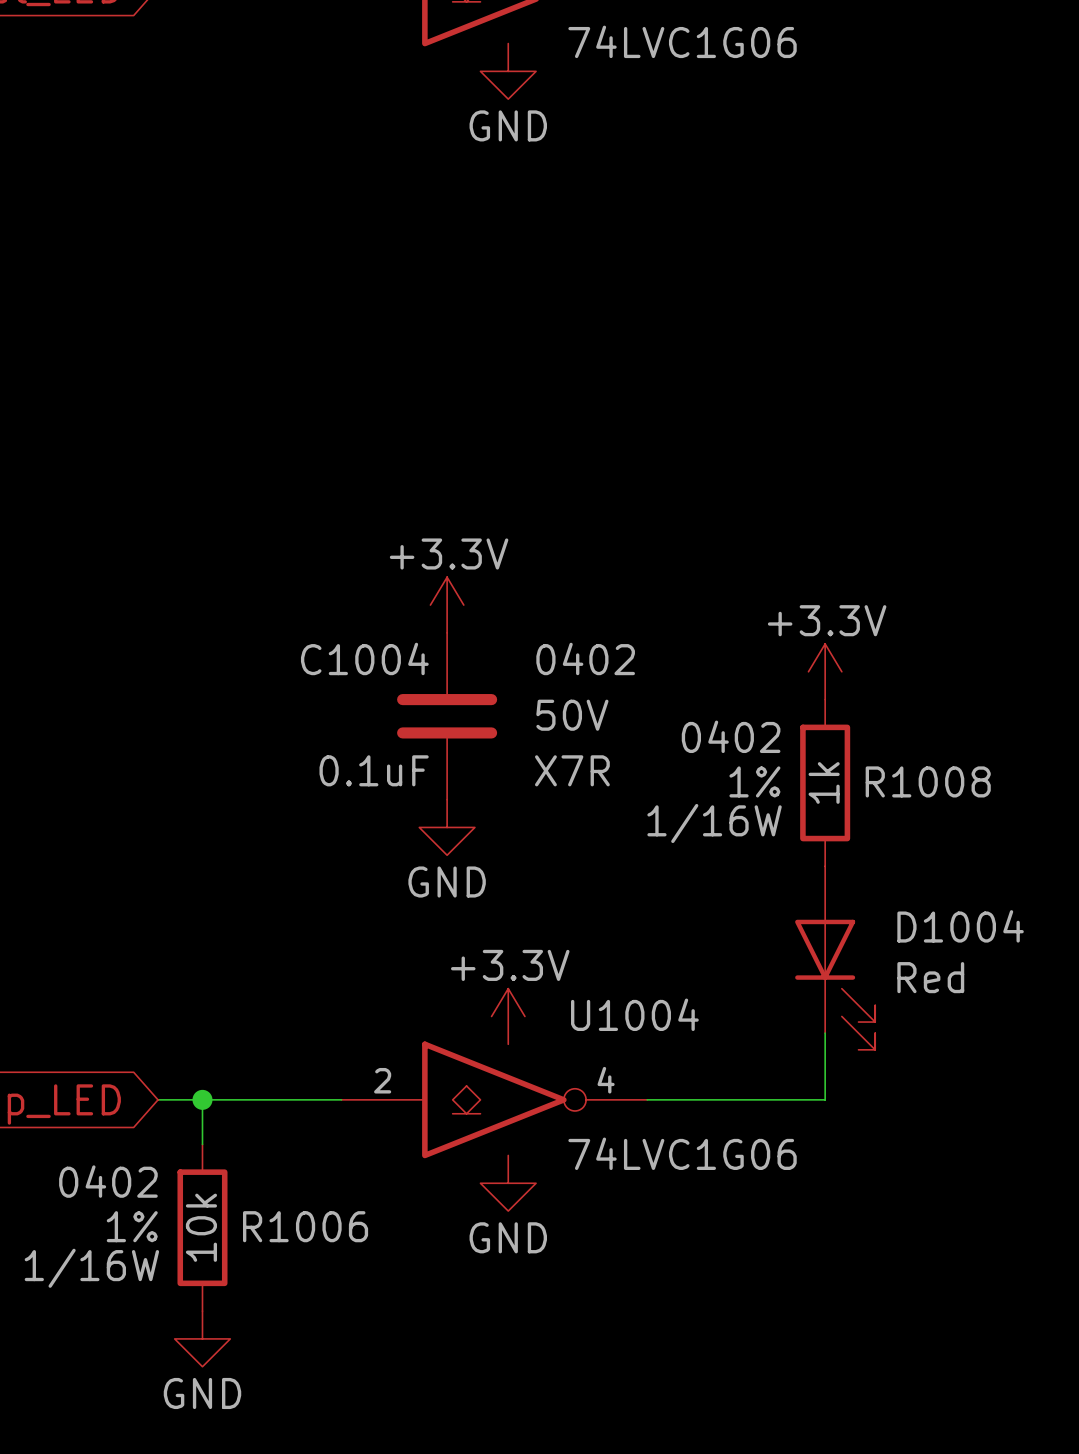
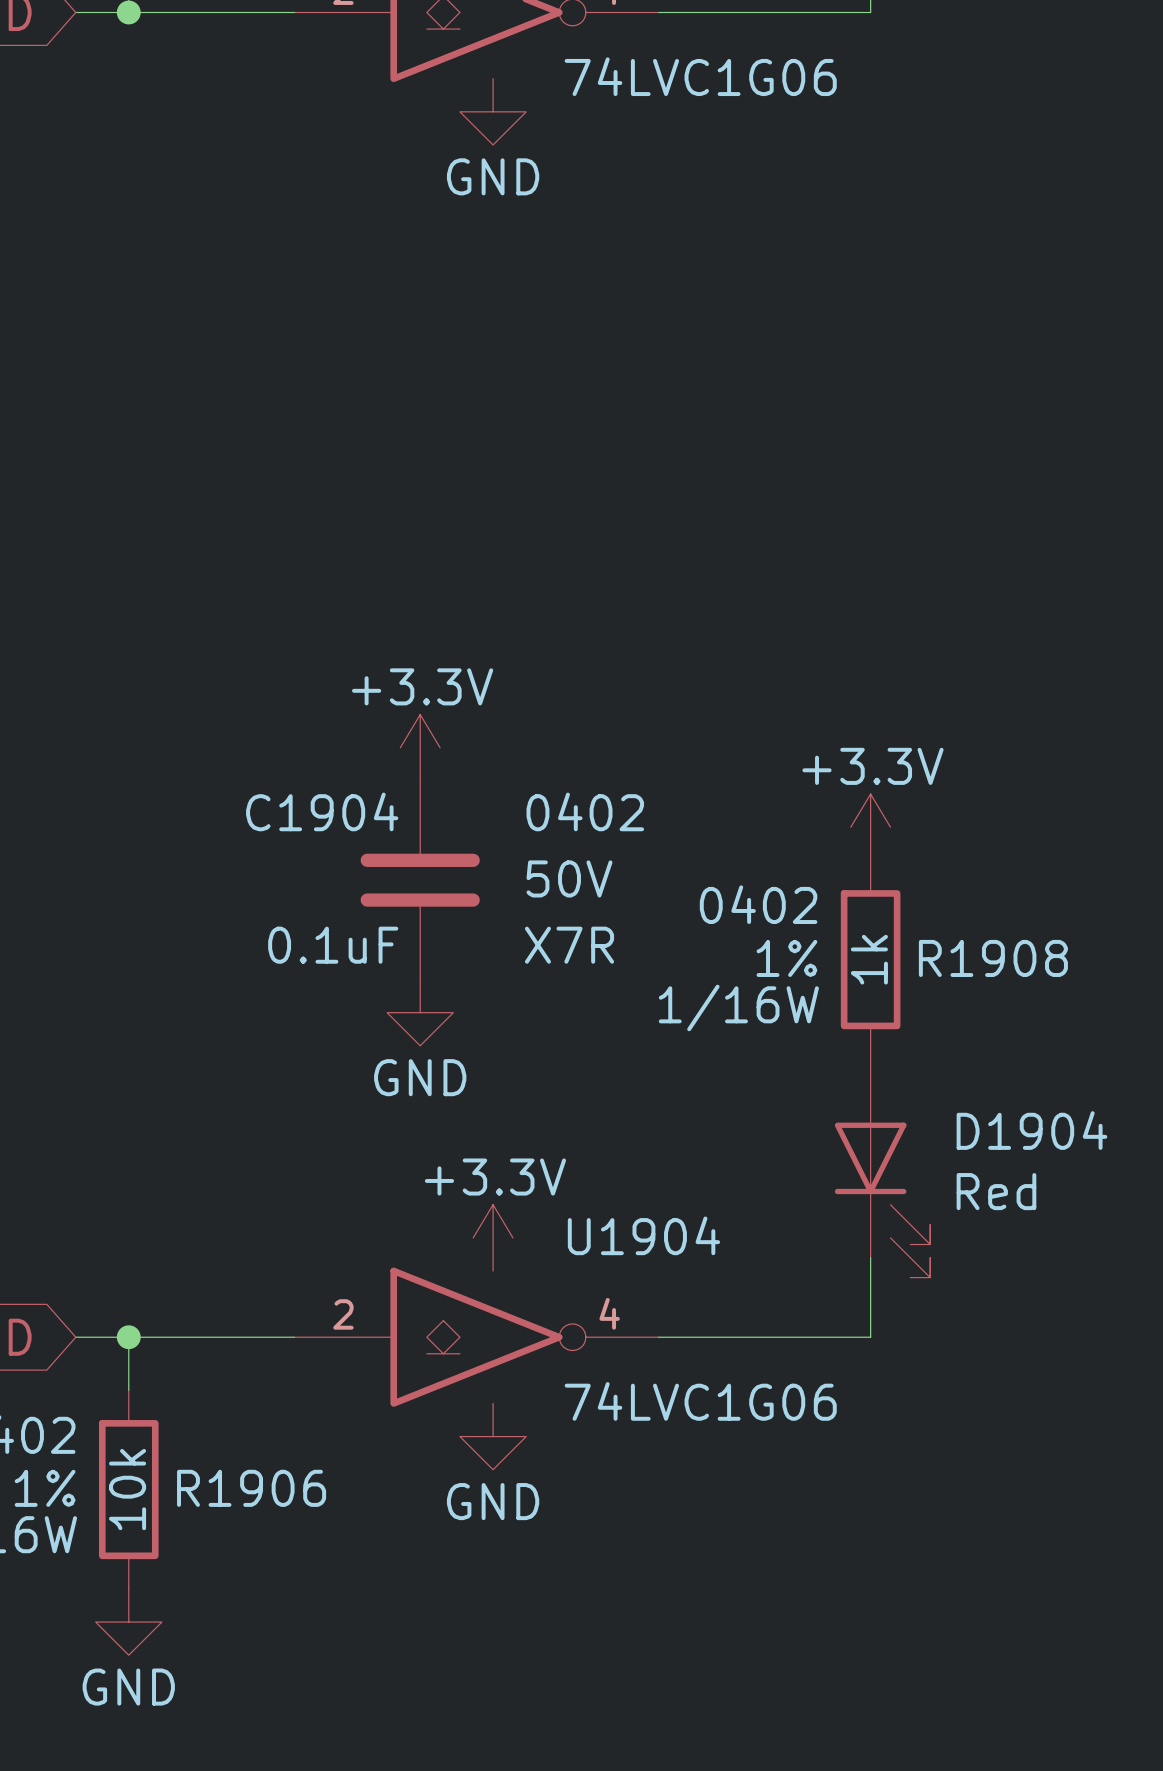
C1004 name: C1004 (364, 658) -> C1904 (322, 811)
R1008 name: R1008 (928, 781) -> R1908 (993, 958)
D1004 name: D1004 (960, 926) -> D1904 (1031, 1130)
U1004 name: U1004 (634, 1014) -> U1904 (643, 1235)
R1006 name: R1006 (305, 1226) -> R1906 (251, 1488)

